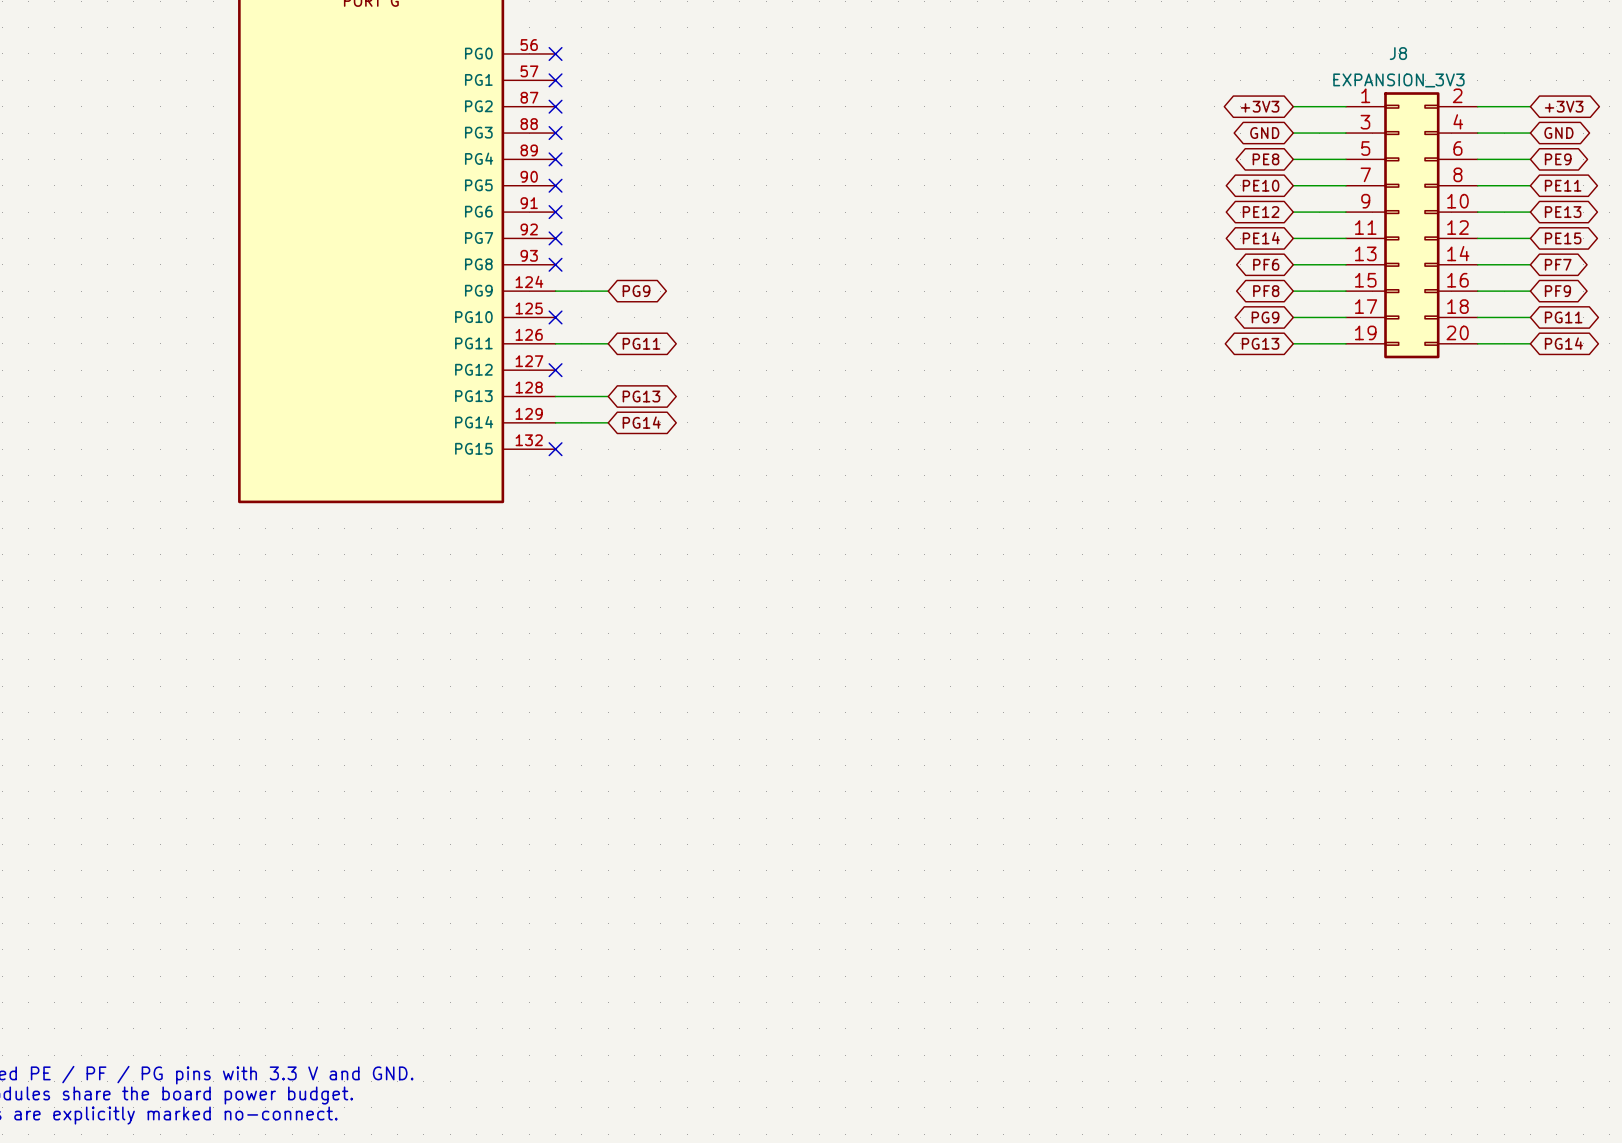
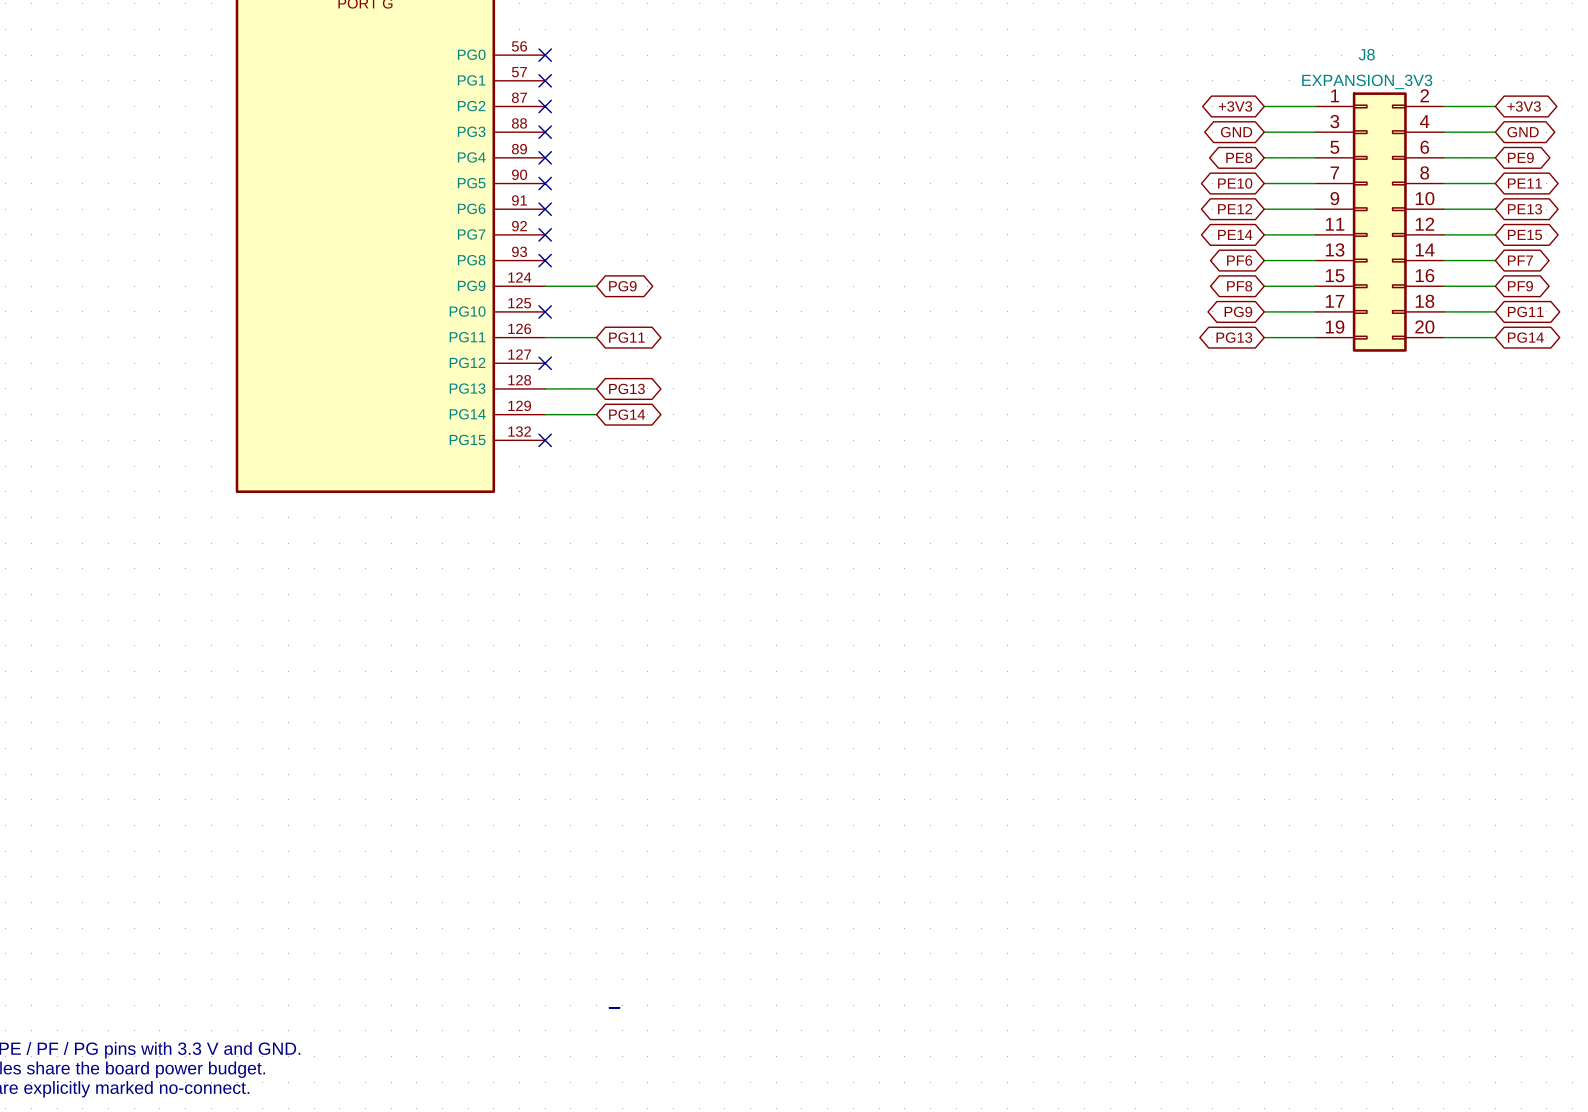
line: none -> (609, 1007) (619, 1007)

